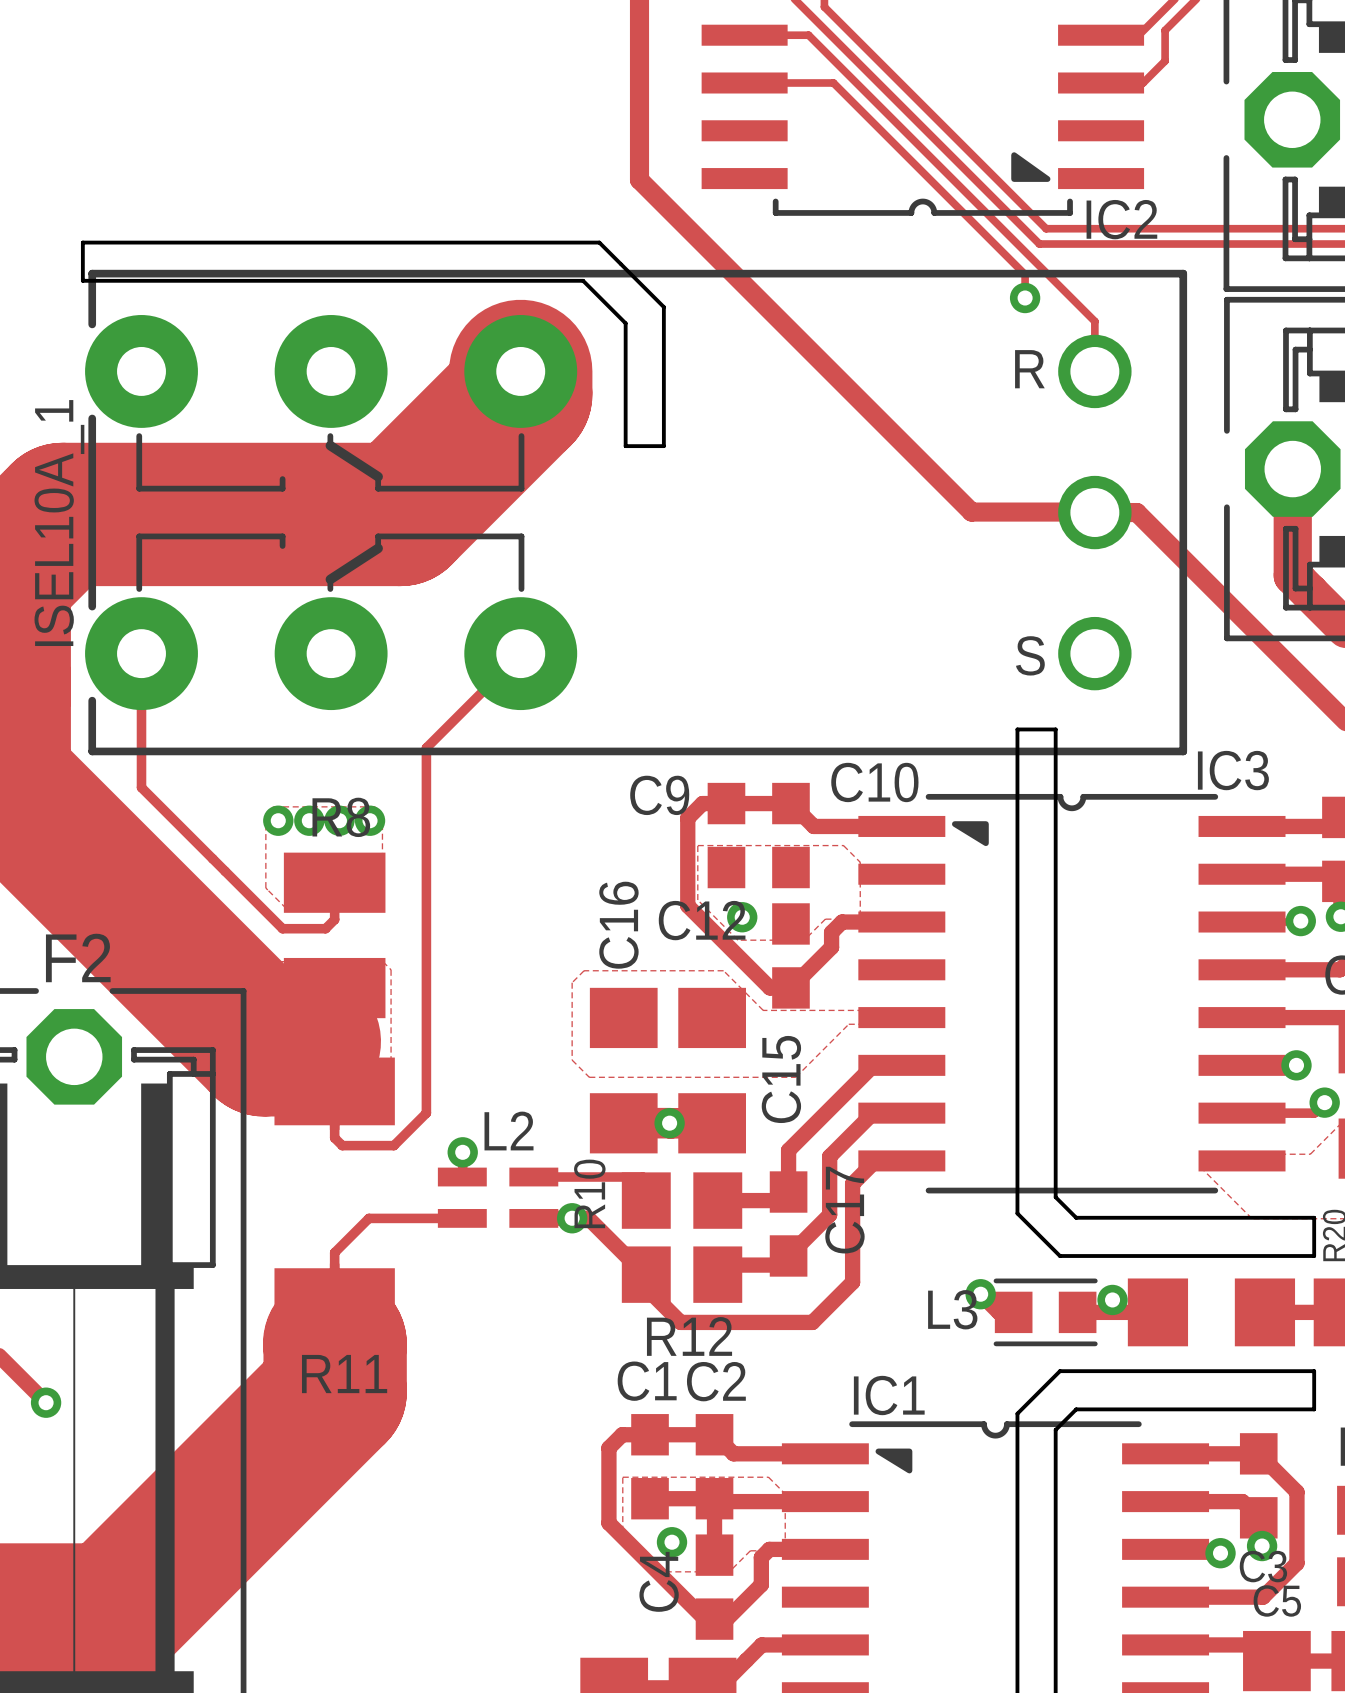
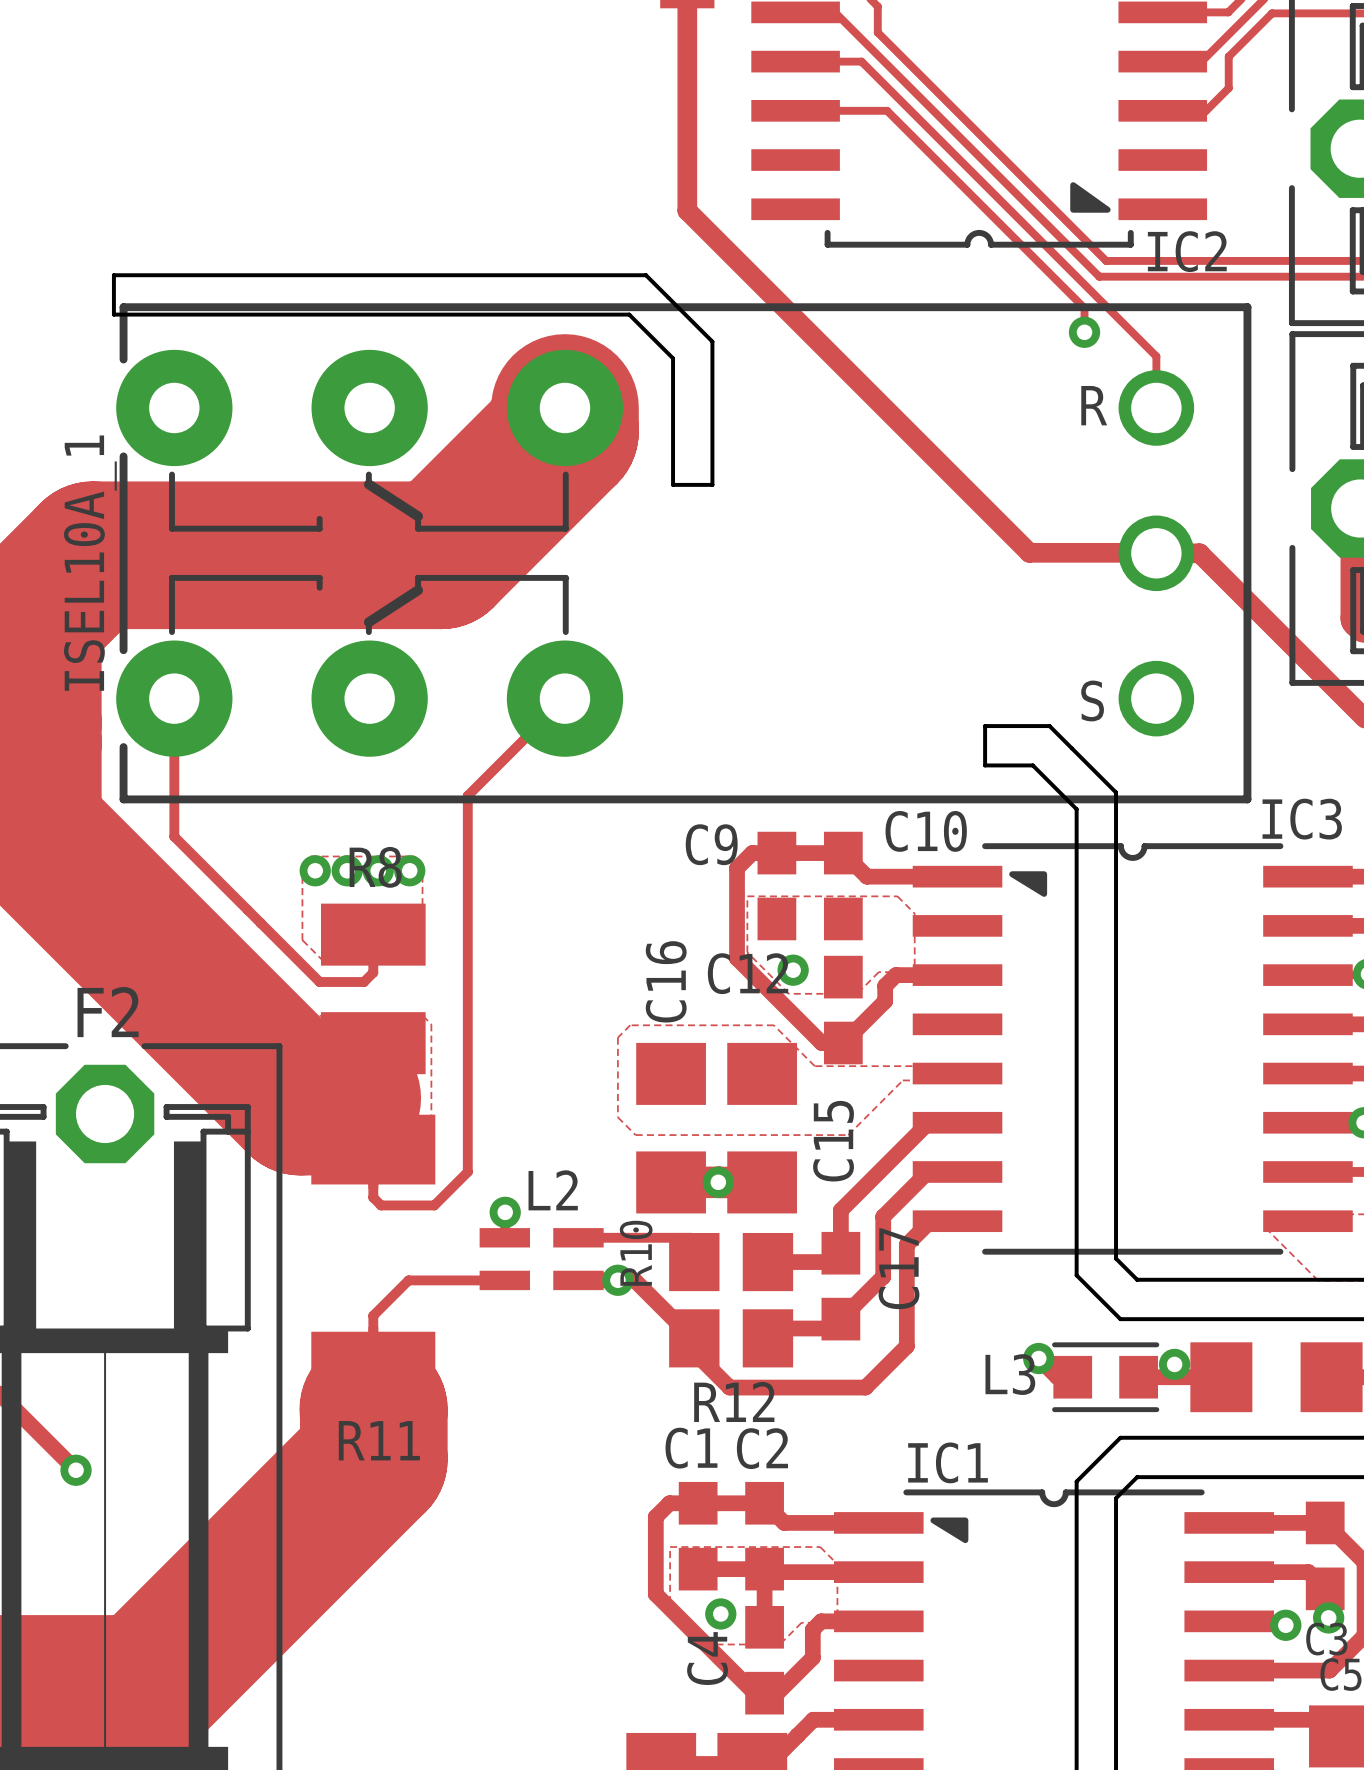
board edge: none -> (1071, 748) (1049, 726) (985, 726) (985, 765) (1032, 765) (1076, 809)
board edge: (1055, 744) (1055, 729) (1017, 729) (1017, 761) -> (1116, 792) (1072, 748)

